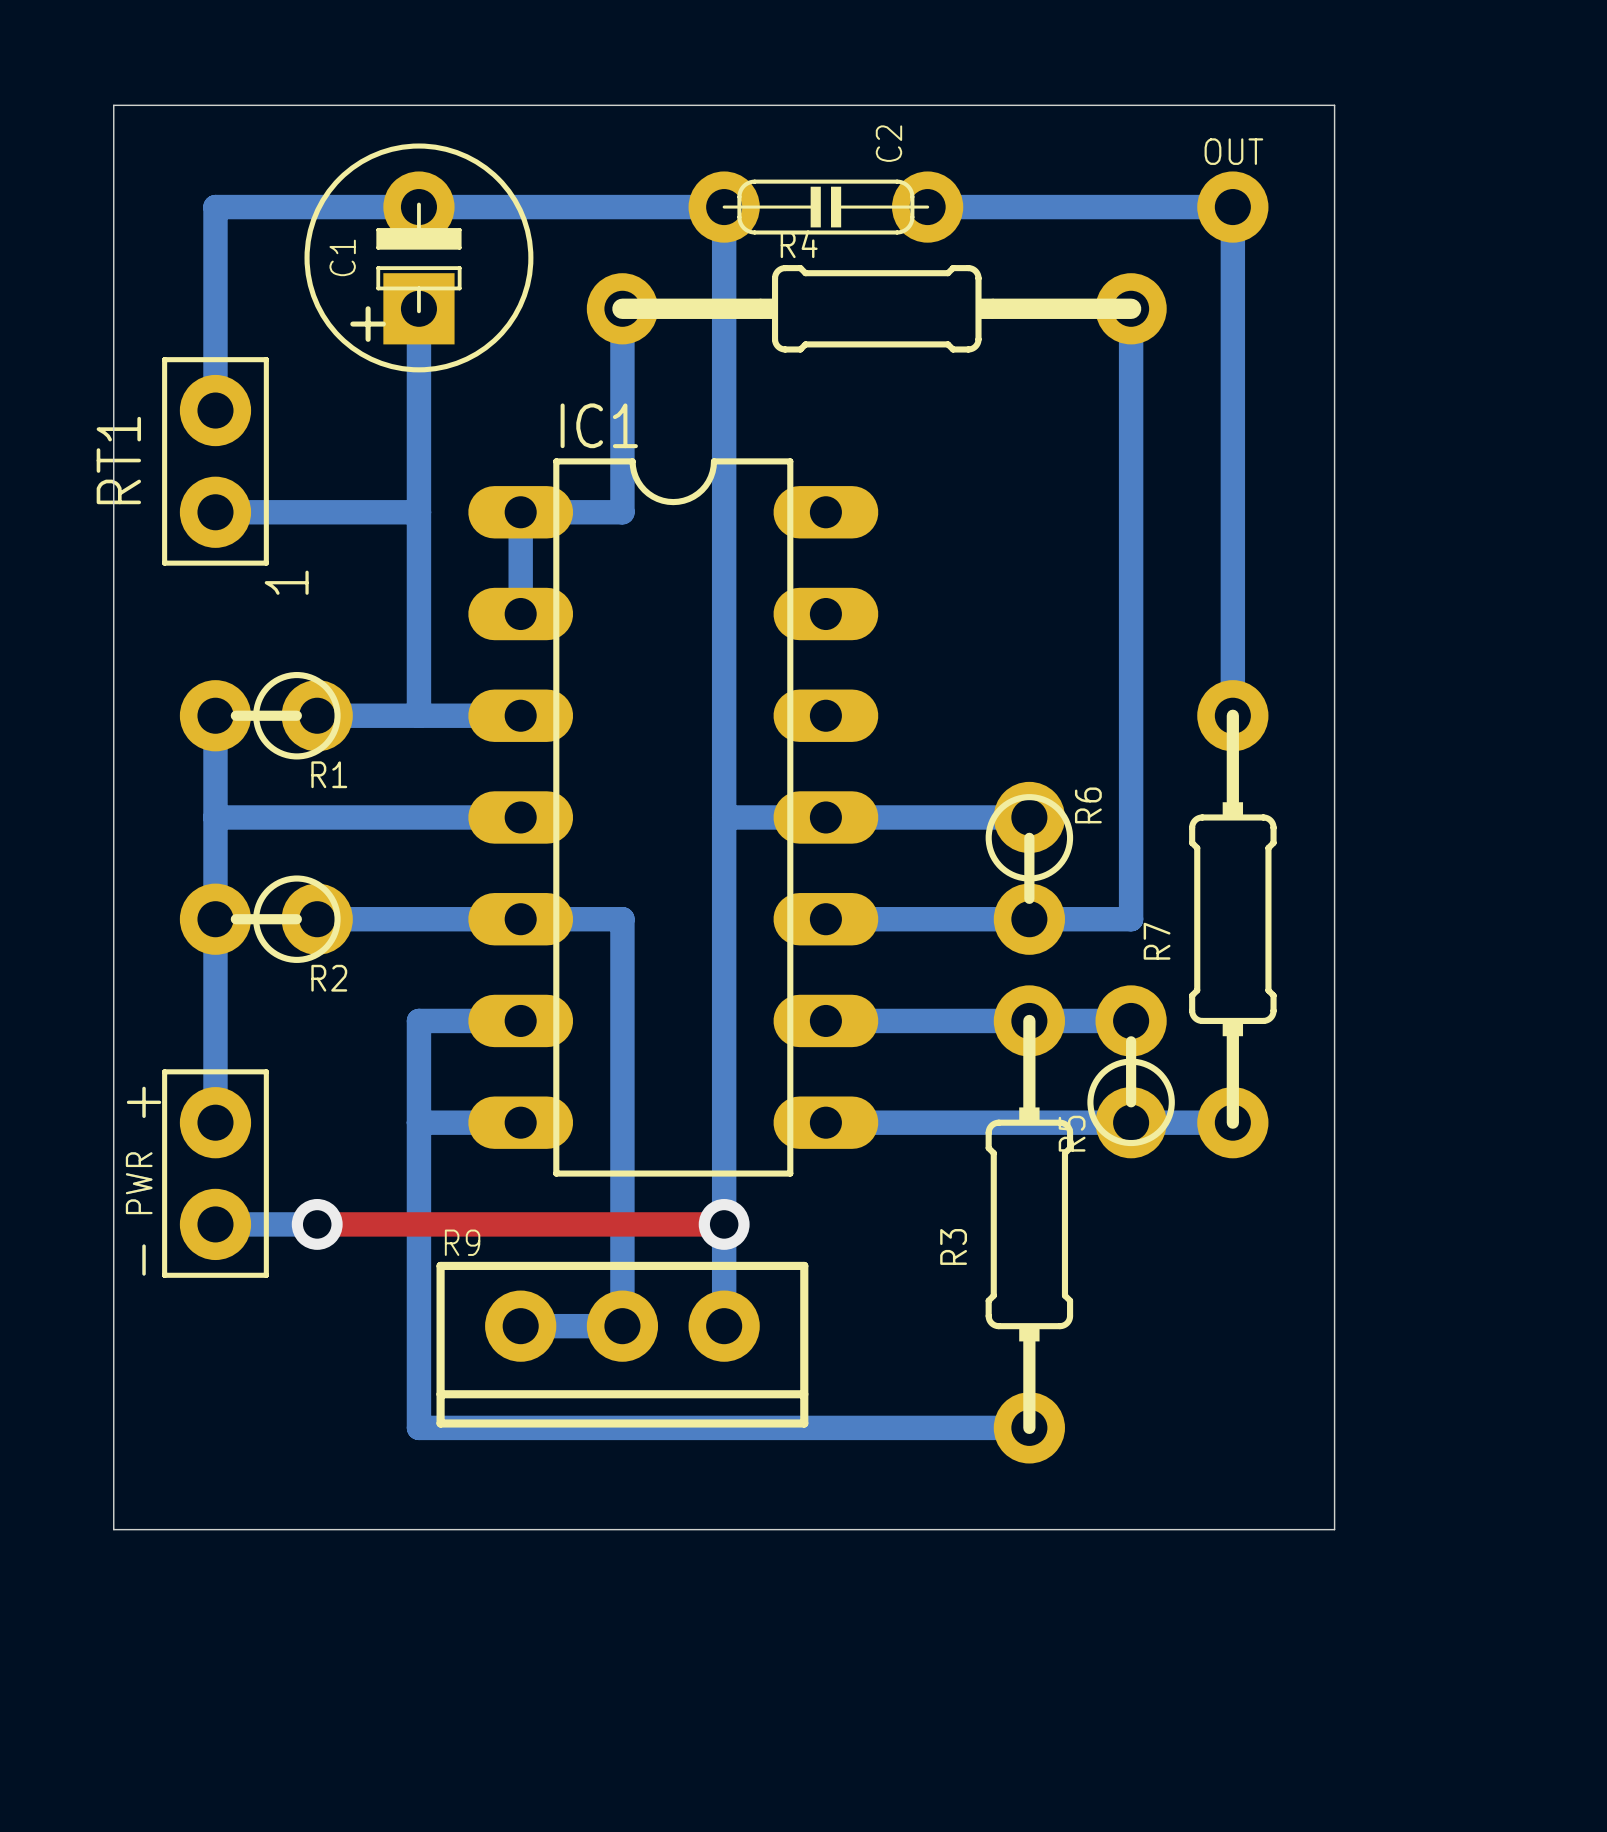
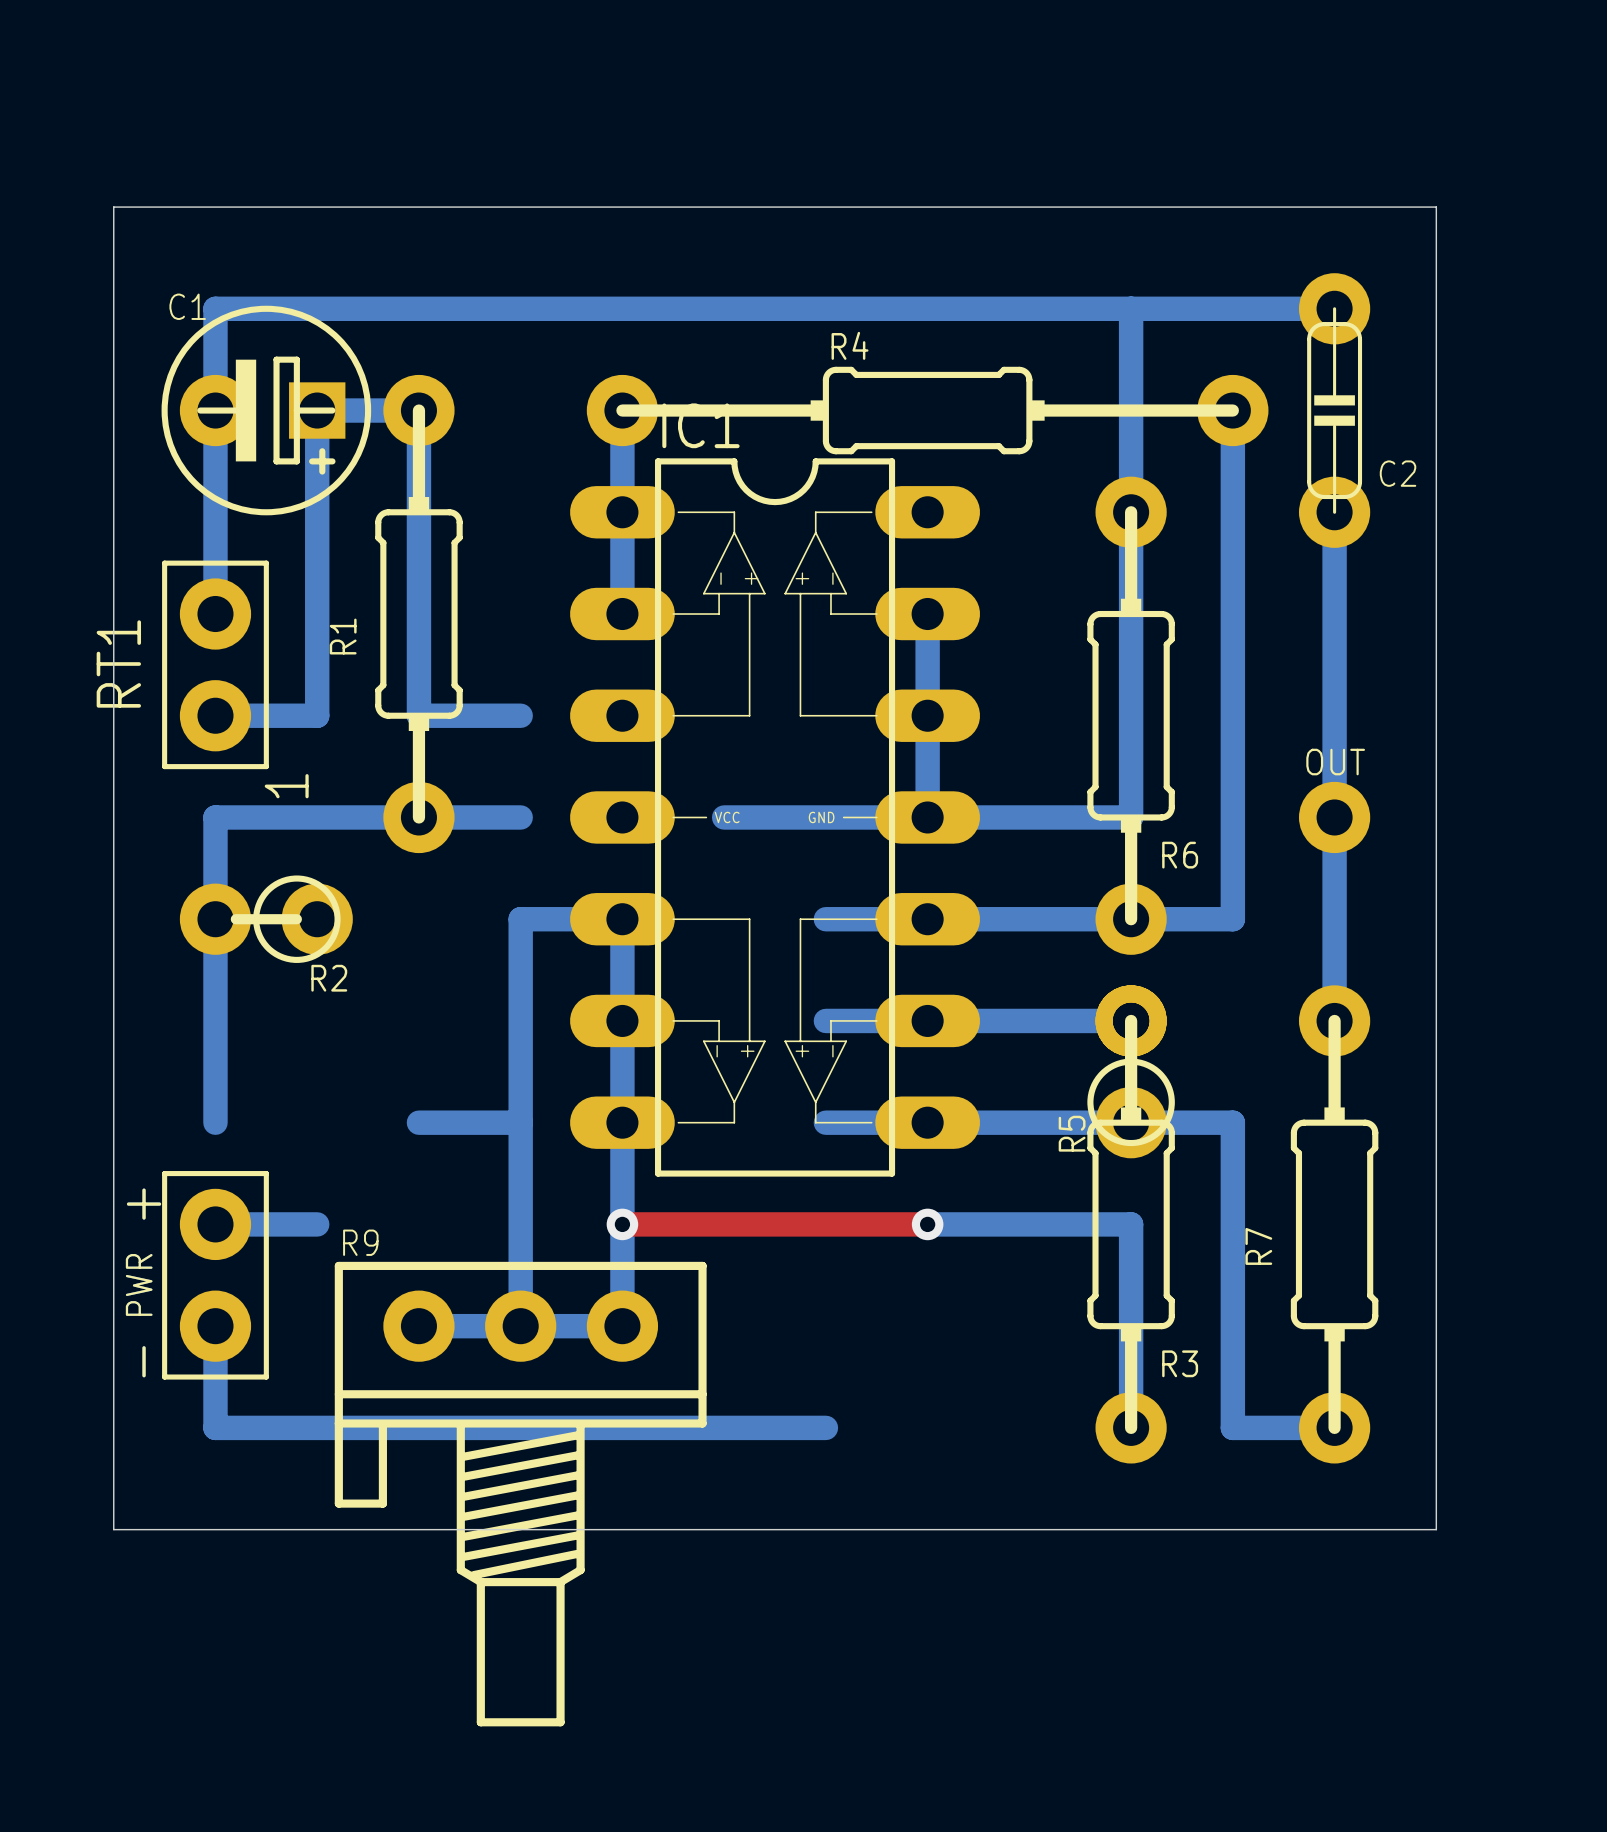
C1 footprint: [304, 143, 534, 373] -> [161, 305, 372, 516]
board edge: (113, 207) (113, 105) (1334, 105) (1334, 1529) -> (113, 207) (1436, 207) (1436, 1529) (1334, 1529)
C2 rotation: 0° (825, 207) -> 90° clockwise (1334, 410)
C2 position: (825, 207) -> (1334, 410)
bottom track: (927, 207) (1232, 207) (1232, 410) -> none
OUT position: (1232, 207) -> (1334, 817)
C1 name position: C1 (342, 257) -> C1 (187, 306)
R4 footprint: [586, 265, 1167, 353] -> [586, 366, 1269, 455]
bottom track: (215, 308) (215, 207) (724, 207) (724, 1326) -> (215, 308) (1334, 308)
bottom track: (418, 308) (418, 410) -> (215, 715) (317, 715) (317, 410) (418, 410)
bottom track: (622, 308) (622, 410) -> none
bottom track: none -> (215, 410) (215, 614)
IC1 footprint: [468, 458, 879, 1177] -> [570, 458, 981, 1177]
RT1 position: (215, 461) -> (215, 664)
bottom track: (215, 512) (418, 512) -> none
bottom track: (622, 512) (520, 512) (520, 614) -> (622, 512) (622, 614)
bottom track: none -> (1334, 512) (1334, 1020)
bottom track: none -> (927, 614) (927, 817)
R1 footprint: [179, 671, 353, 760] -> [375, 374, 463, 854]
bottom track: (215, 715) (215, 817) -> none
bottom track: (317, 715) (418, 715) -> none
bottom track: none -> (1232, 715) (1232, 919) (1131, 919)
R1 name position: R1 (329, 774) -> R1 (343, 636)
R6 footprint: [985, 781, 1074, 955] -> [1087, 476, 1175, 955]
R6 name position: R6 (1088, 805) -> R6 (1180, 855)
bottom track: (1131, 817) (1131, 919) -> (1131, 817) (1029, 817)
bottom track: (317, 919) (520, 919) -> (418, 1326) (520, 1326) (520, 919)
R7 position: (1232, 919) -> (1334, 1224)
bottom track: (520, 1020) (418, 1020) (418, 1427) -> (215, 1326) (215, 1427) (418, 1427)
bottom track: none -> (1232, 1122) (1232, 1427) (1334, 1427)
part position: (215, 1173) -> (215, 1275)
top track: (317, 1224) (622, 1224) -> none
via: (317, 1224) -> none
via: none -> (622, 1224)
top track: none -> (724, 1224) (927, 1224)
via: (724, 1224) -> none
bottom track: none -> (927, 1224) (1131, 1224) (1131, 1427)
via: none -> (927, 1224)
R3 position: (1029, 1224) -> (1131, 1224)
R9 name position: R9 (462, 1242) -> R9 (360, 1242)
R3 name rotation: 0° (953, 1246) -> 90° clockwise (1180, 1363)
R3 name position: R3 (953, 1246) -> R3 (1180, 1363)
R9 footprint: [436, 1261, 809, 1428] -> [334, 1261, 707, 1727]
bottom track: (825, 1427) (1029, 1427) -> none

